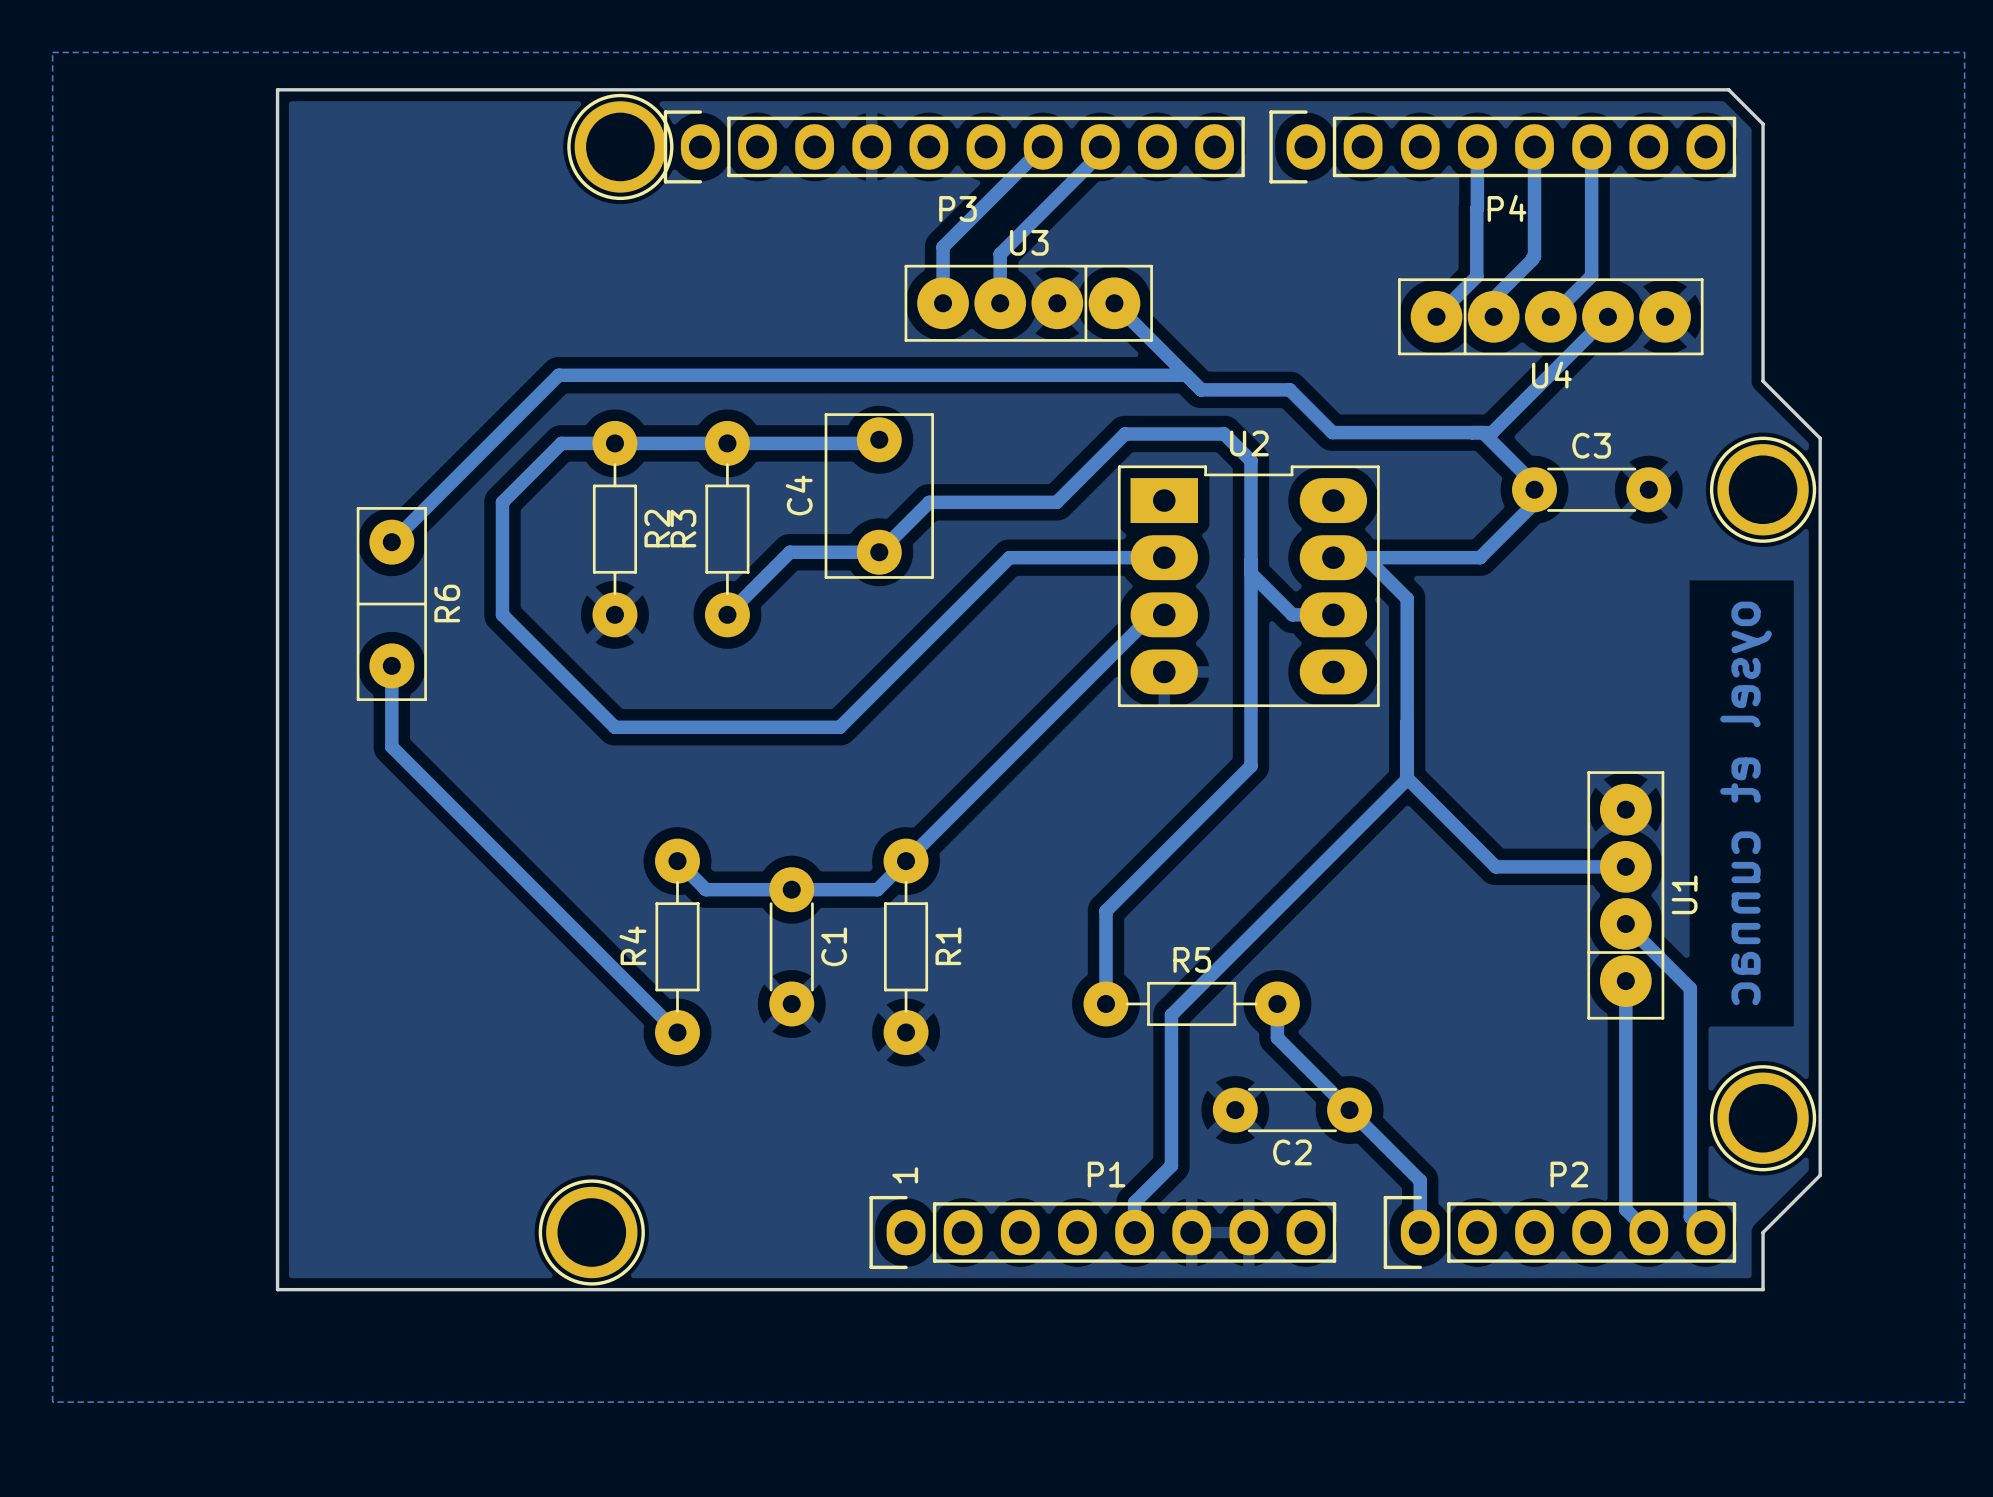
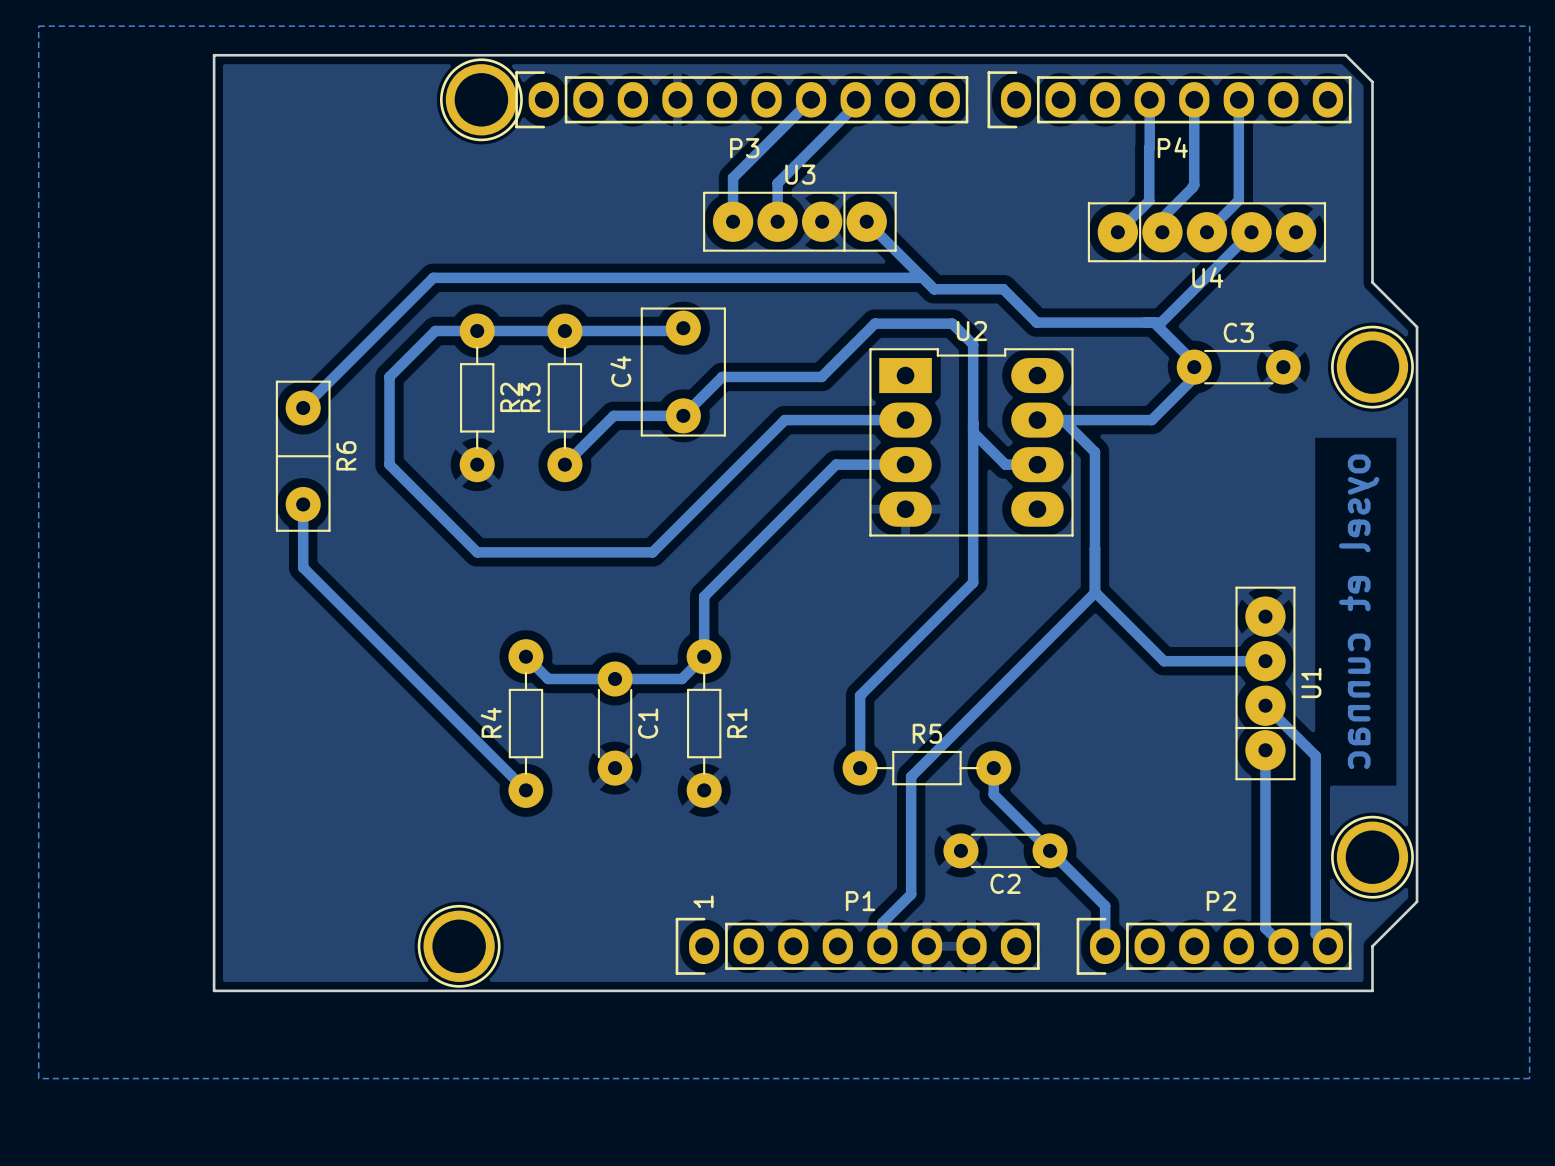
bottom track: (1152, 614) (906, 861) -> (896, 464) (836, 464) (704, 596) (704, 656)

